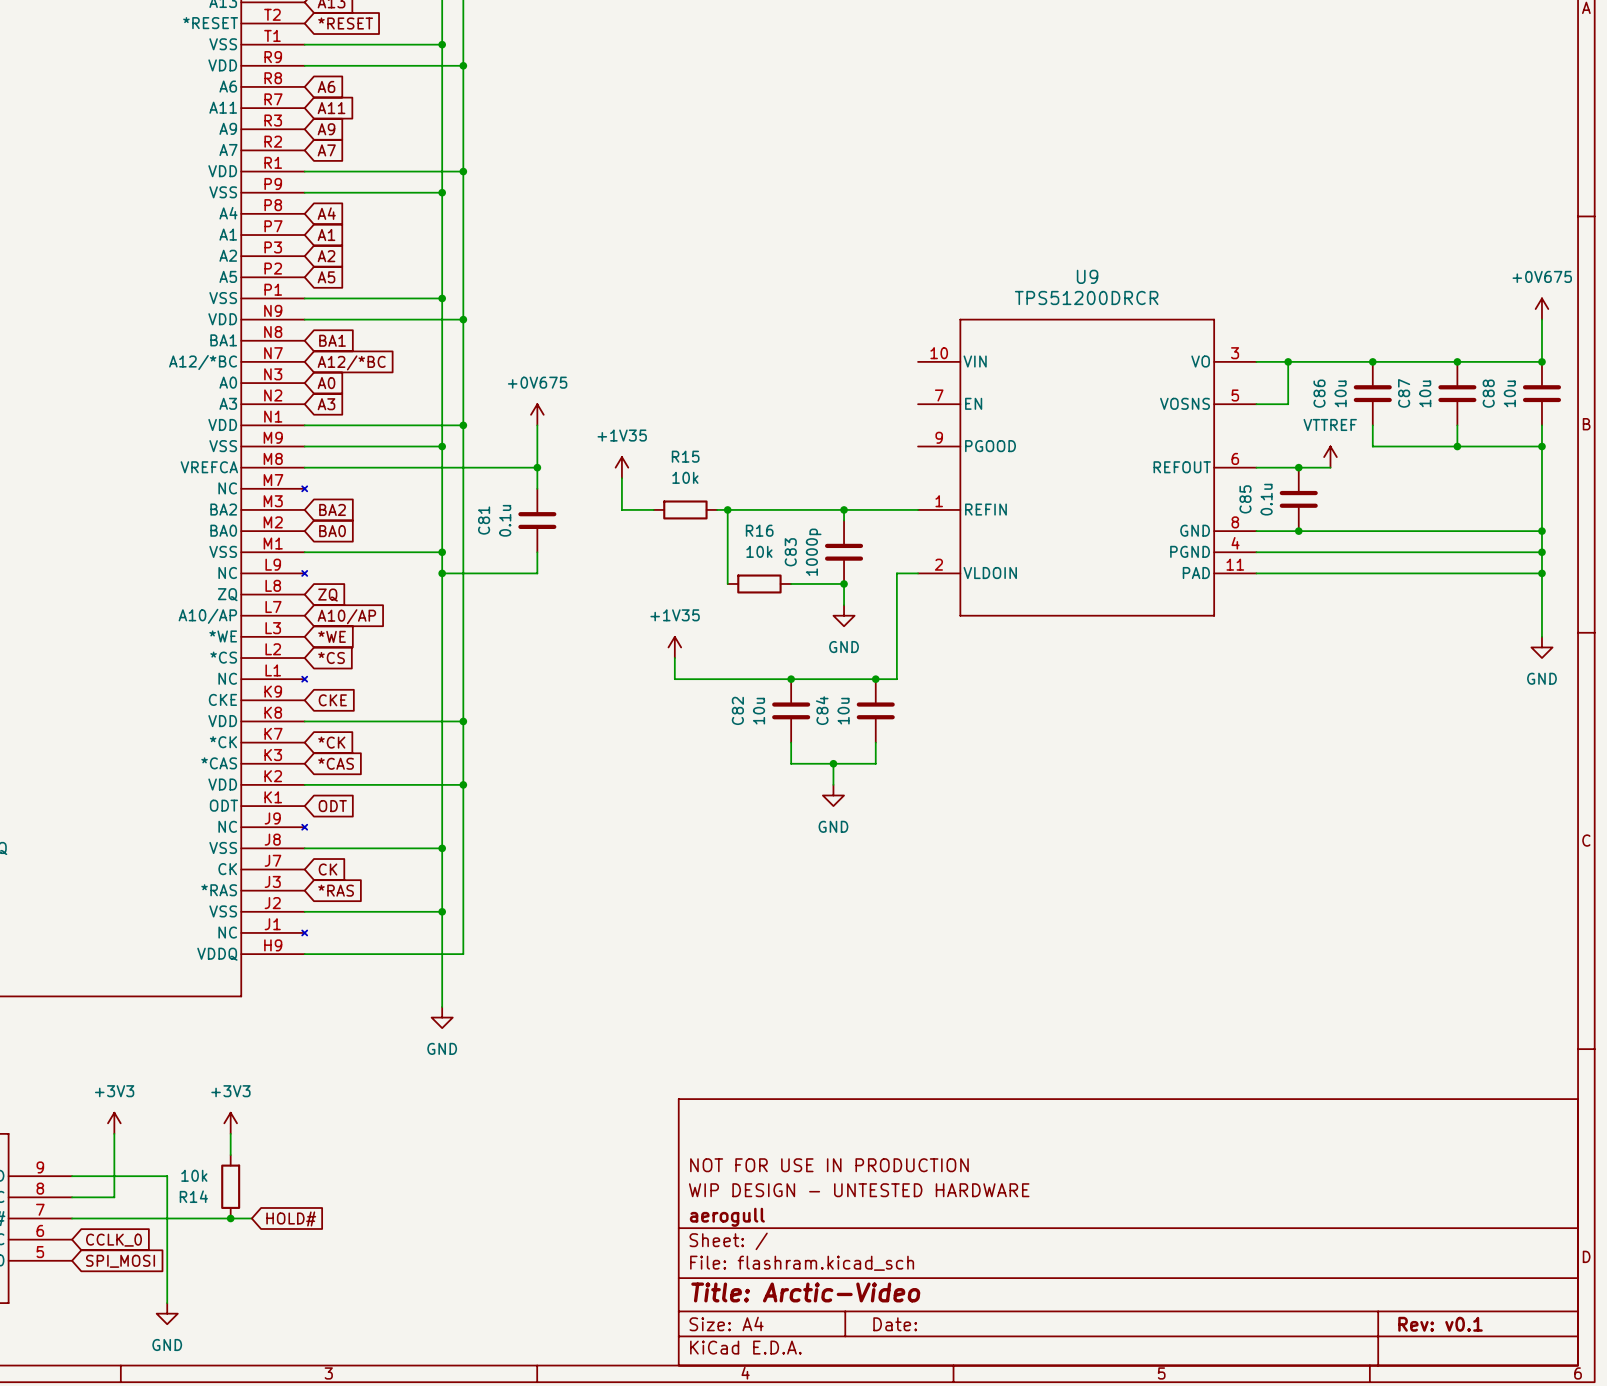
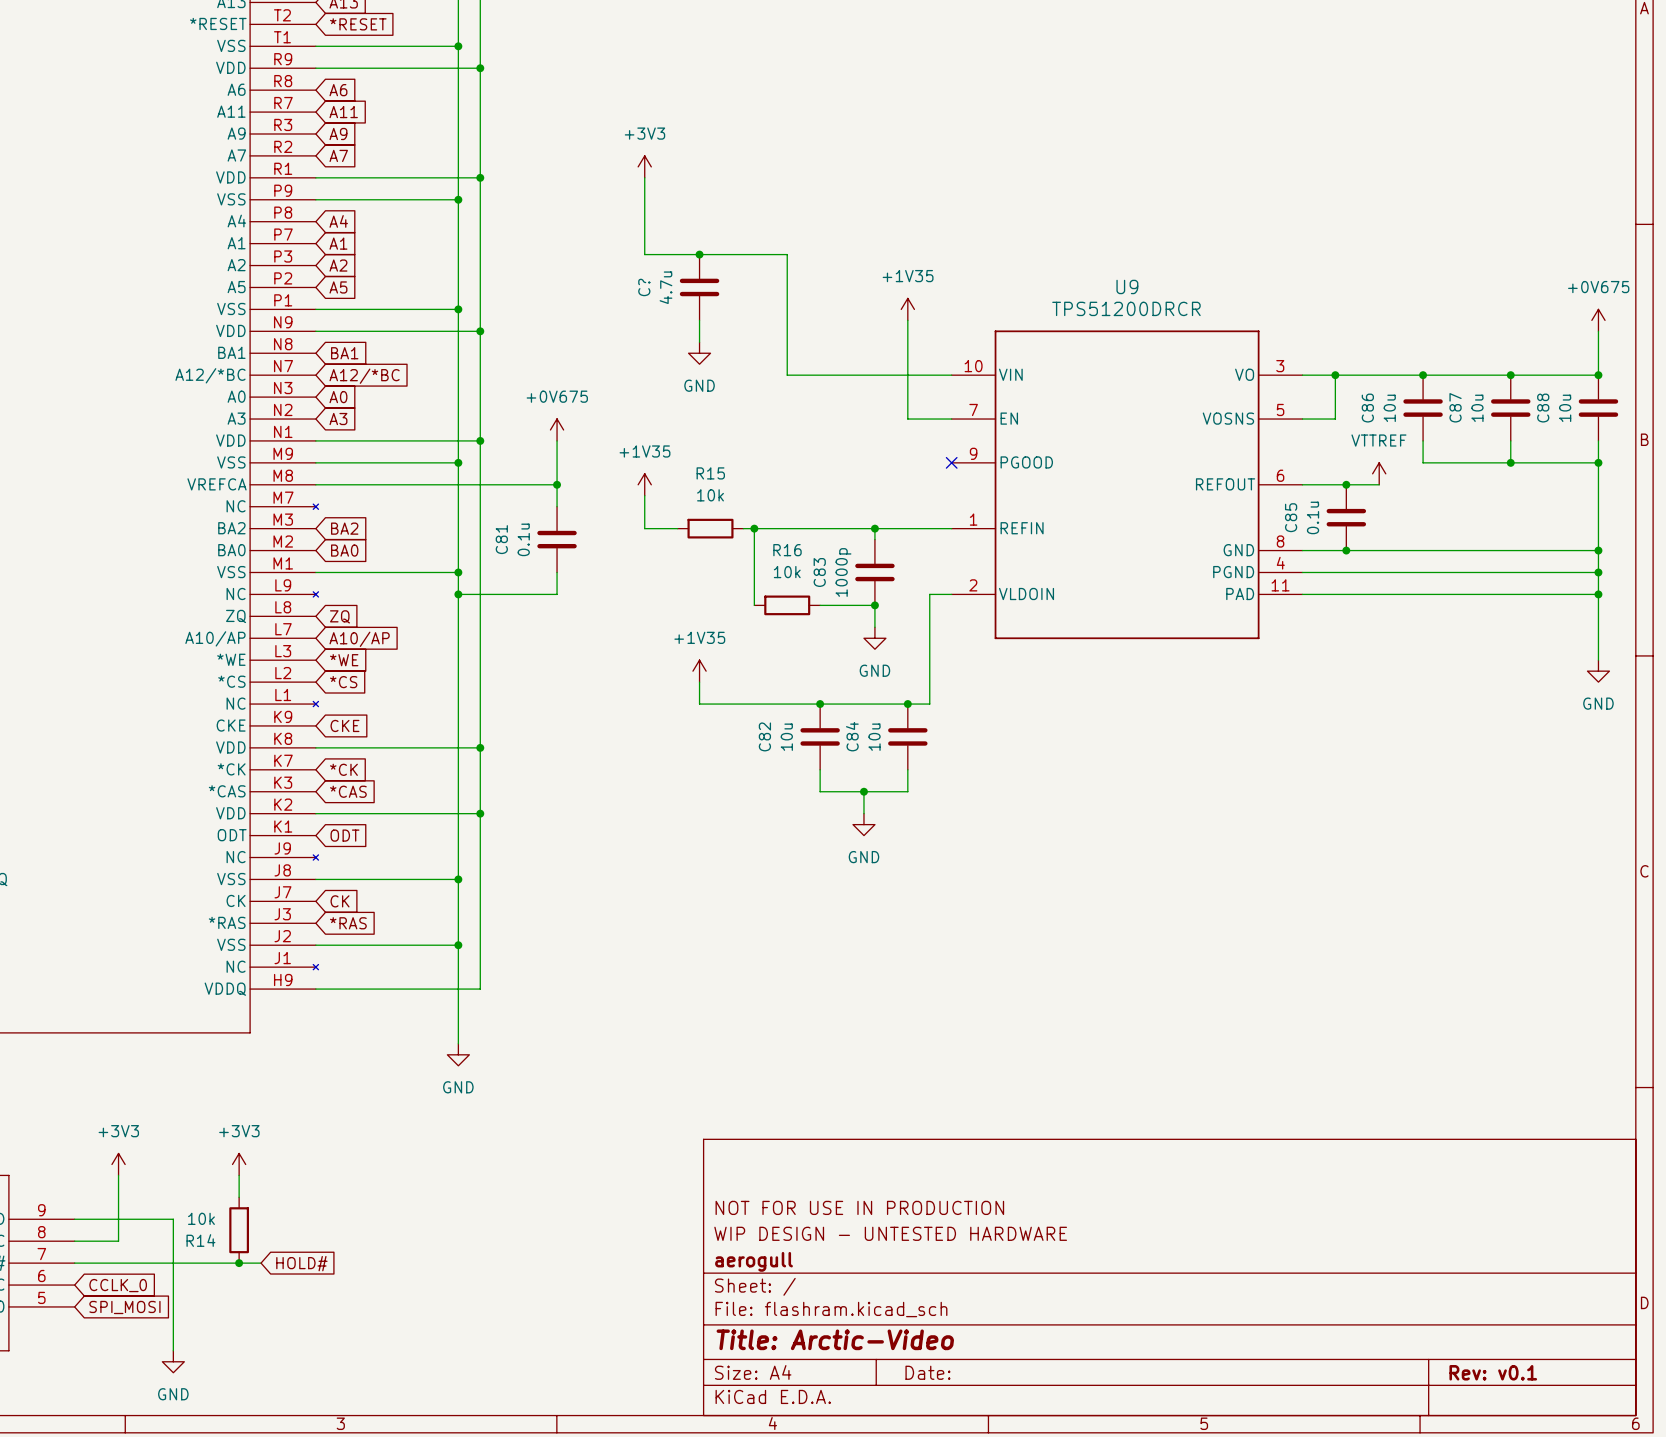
power symbol: none -> +3V3 (644, 166)
wire: none -> (644, 177) (644, 254) (787, 254) (787, 375) (951, 375)
junction: none -> (699, 254)
C?: none -> 4.7u (699, 287)
power symbol: none -> +1V35 (907, 309)
wire: none -> (699, 320) (699, 342)
wire: none -> (907, 320) (907, 419) (951, 419)
power symbol: none -> GND (699, 353)
no-connect mark: none -> (951, 462)

